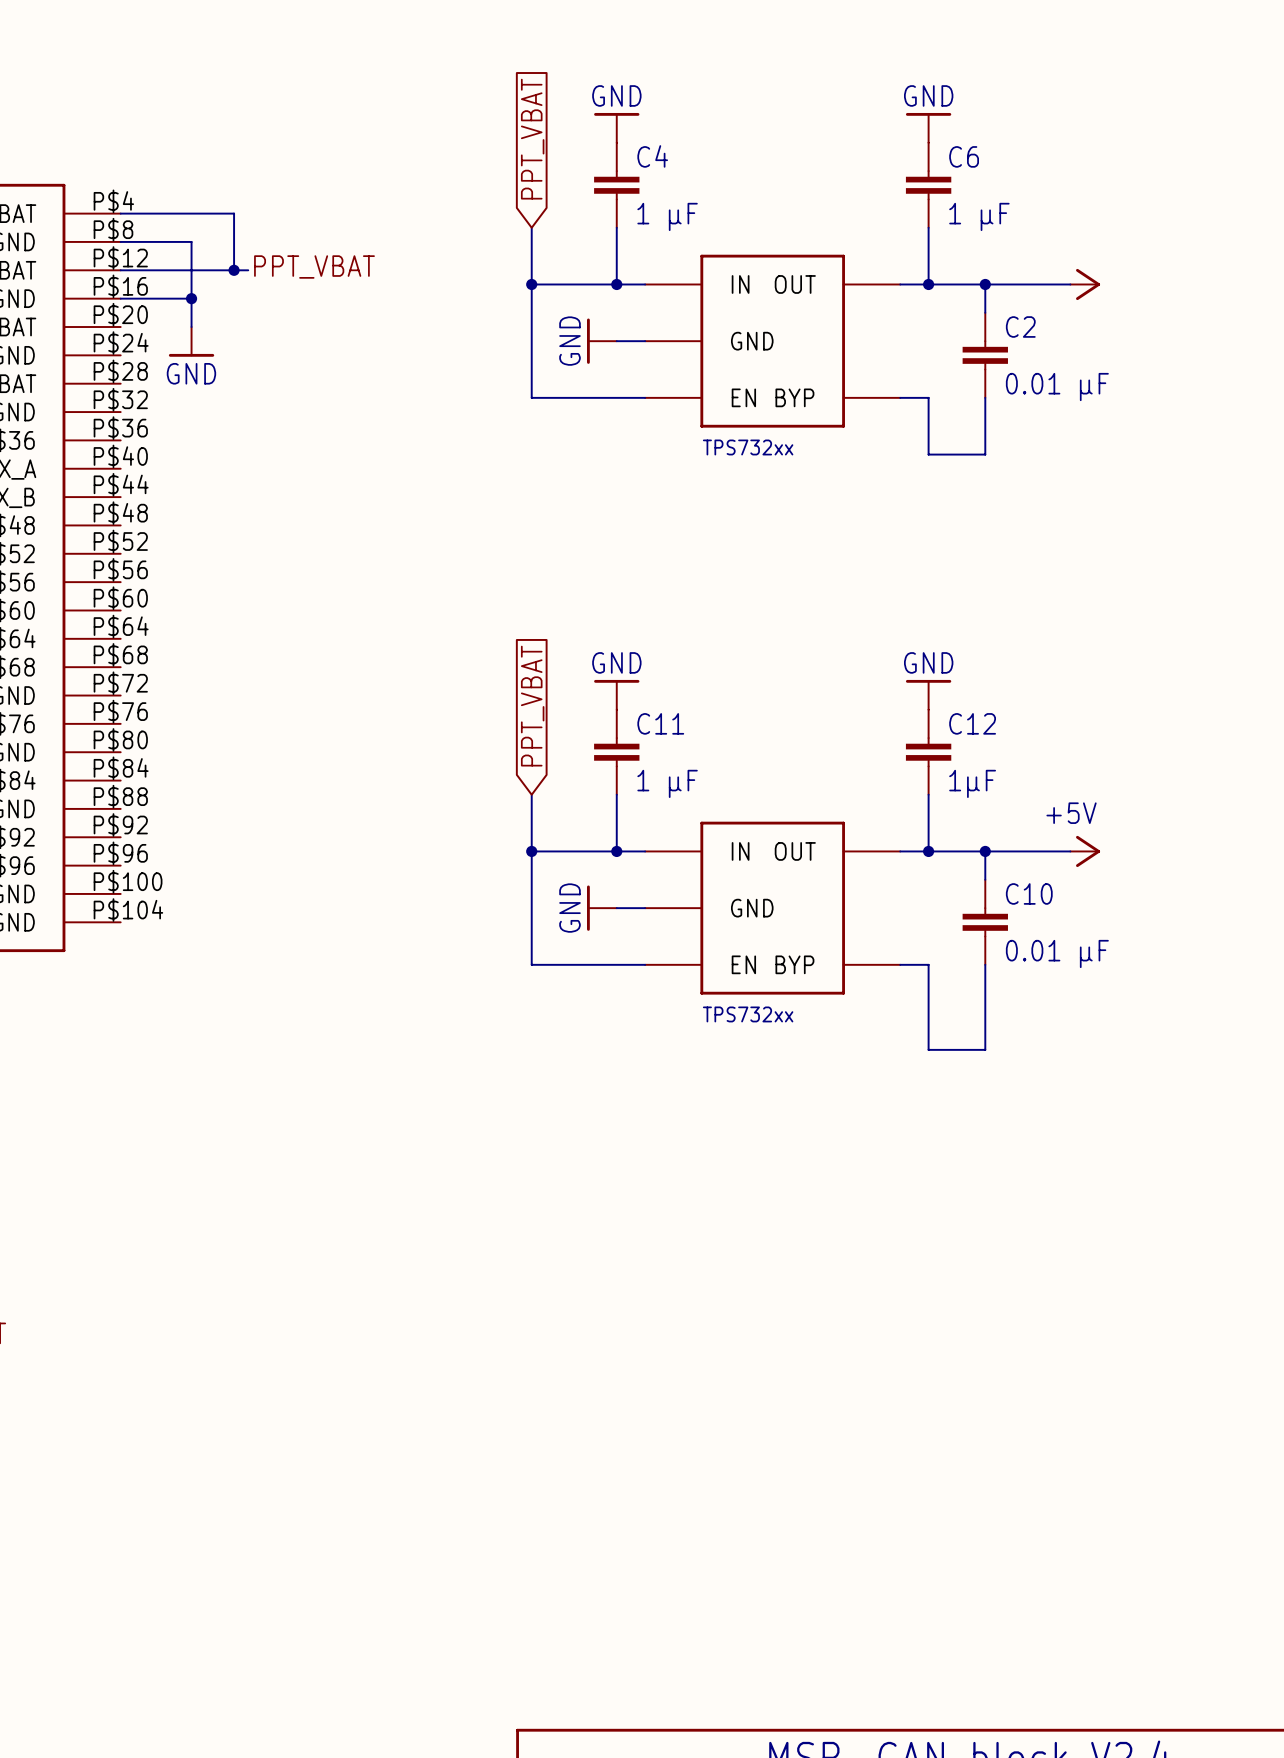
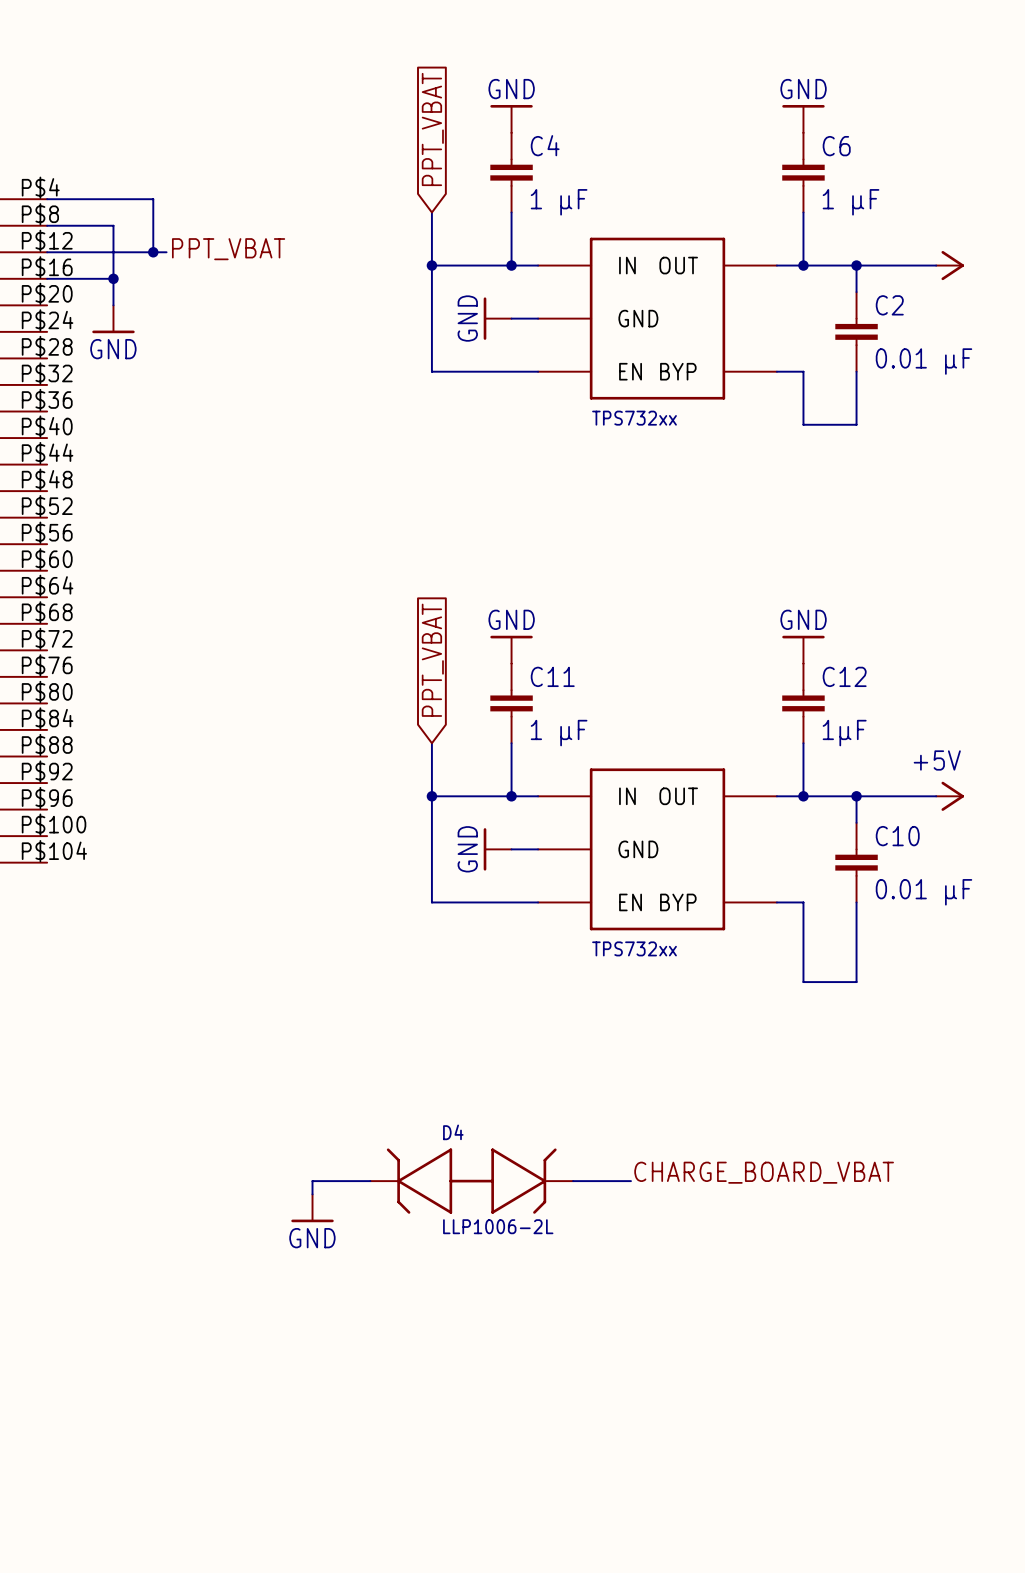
label: none -> CHARGE_BOARD_VBAT (764, 1172)
wire: none -> (370, 1181) (312, 1181) (312, 1194)
D4: none -> LLP1006-2L (471, 1181)
wire: none -> (573, 1181) (630, 1181)
power symbol: none -> GND (312, 1208)

